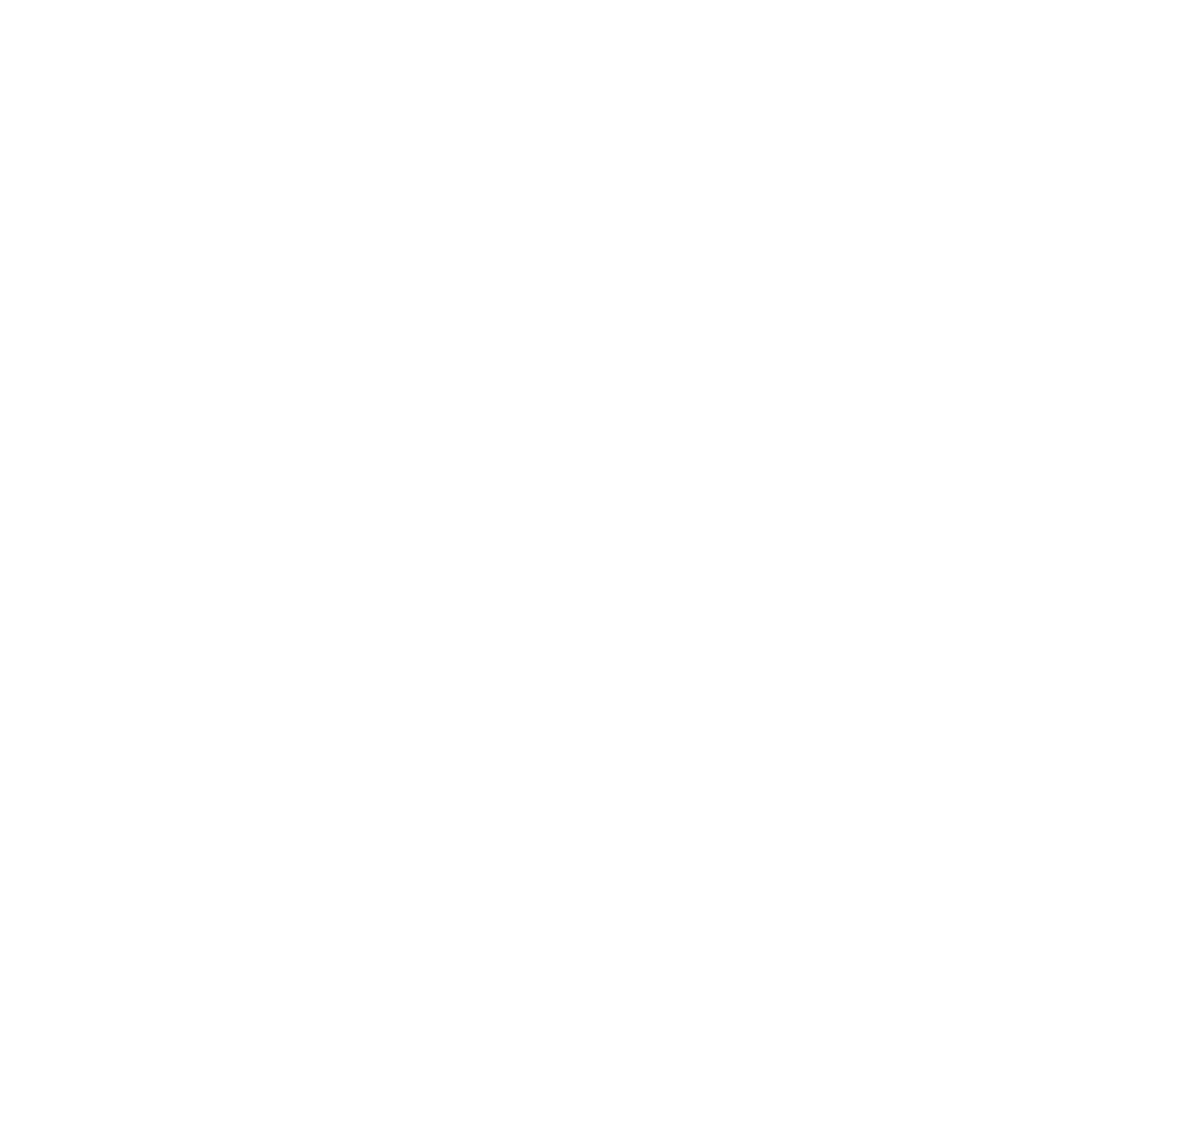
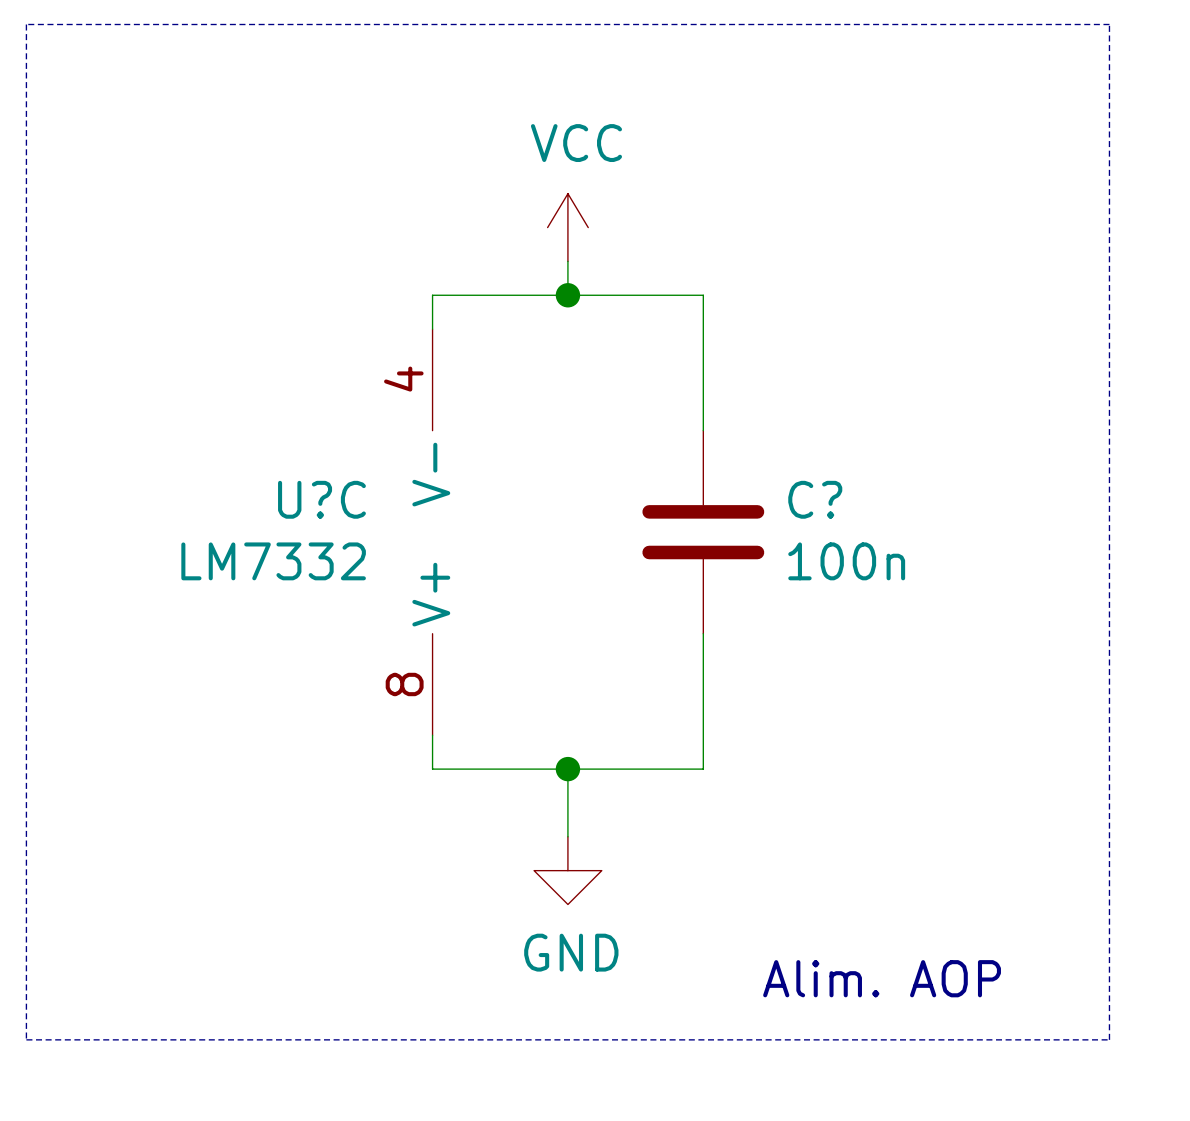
line: none -> (26, 24) (26, 1039) (1109, 1039) (1109, 24) (26, 24)
power symbol: none -> VCC (567, 227)
wire: none -> (567, 261) (567, 295)
junction: none -> (567, 295)
wire: none -> (432, 329) (432, 295) (703, 295) (703, 430)
U?C: none -> LM7332 (432, 532)
C?: none -> 100n (703, 532)
wire: none -> (703, 633) (703, 769) (432, 769) (432, 735)
wire: none -> (567, 769) (567, 836)
junction: none -> (567, 769)
power symbol: none -> GND (567, 870)
text: none -> Alim. AOP (882, 978)

